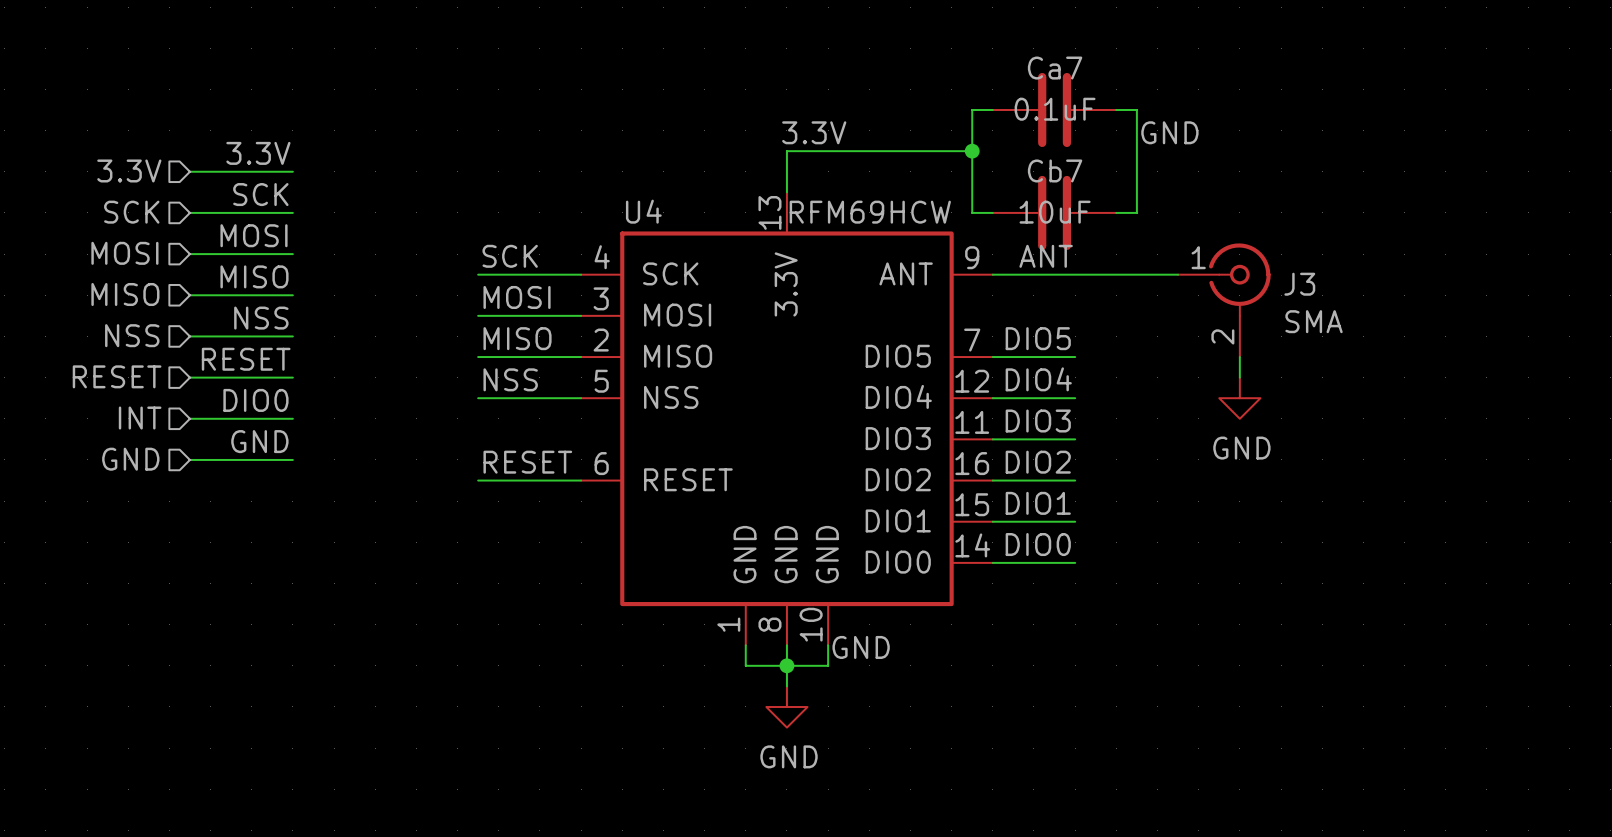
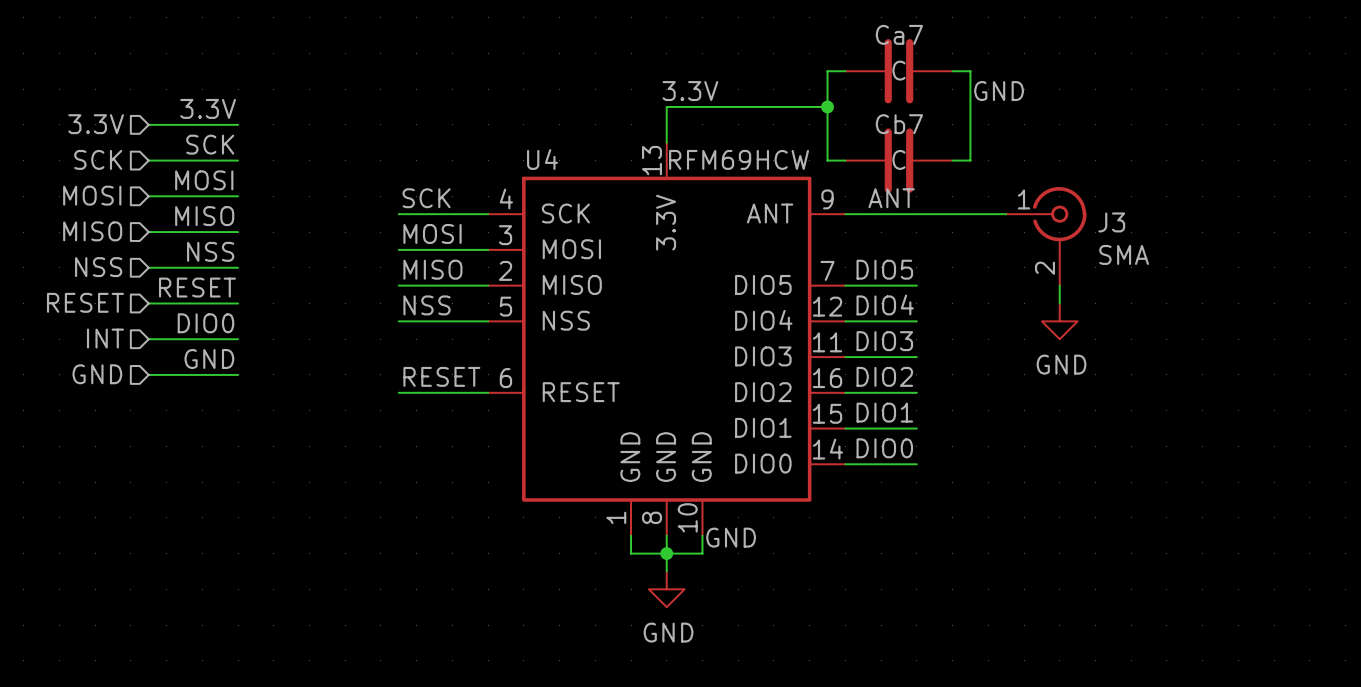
Ca7 value: 0.1uF (1055, 109) -> C (898, 70)
Cb7 value: 10uF (1055, 212) -> C (898, 159)

